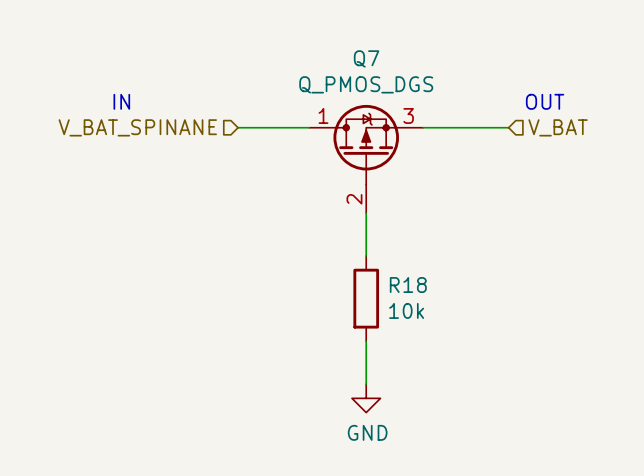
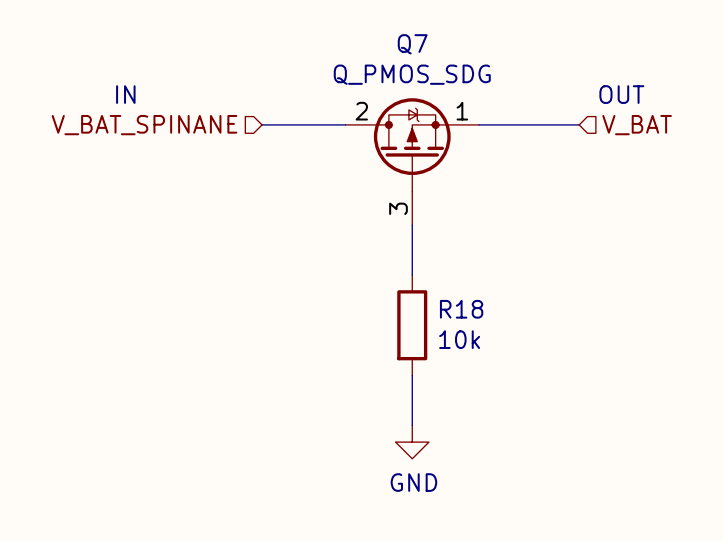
Q7 value: Q_PMOS_DGS (366, 84) -> Q_PMOS_SDG (412, 74)
Q7 pin number: 1 (323, 115) -> 2 (361, 111)
Q7 pin number: 3 (408, 115) -> 1 (462, 111)
Q7 pin number: 2 (354, 199) -> 3 (398, 208)

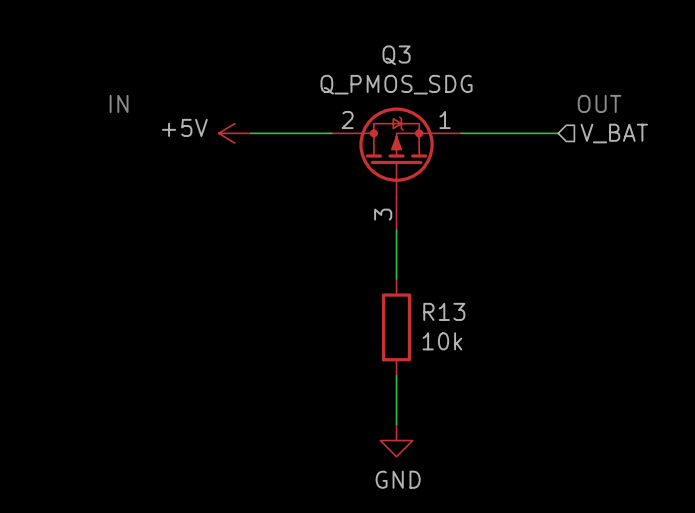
Q7 name: Q7 (412, 44) -> Q3 (396, 55)
power symbol: none -> +5V (234, 133)
hierarchical label: V_BAT_SPINANE (144, 125) -> none
R18 name: R18 (461, 309) -> R13 (444, 311)

